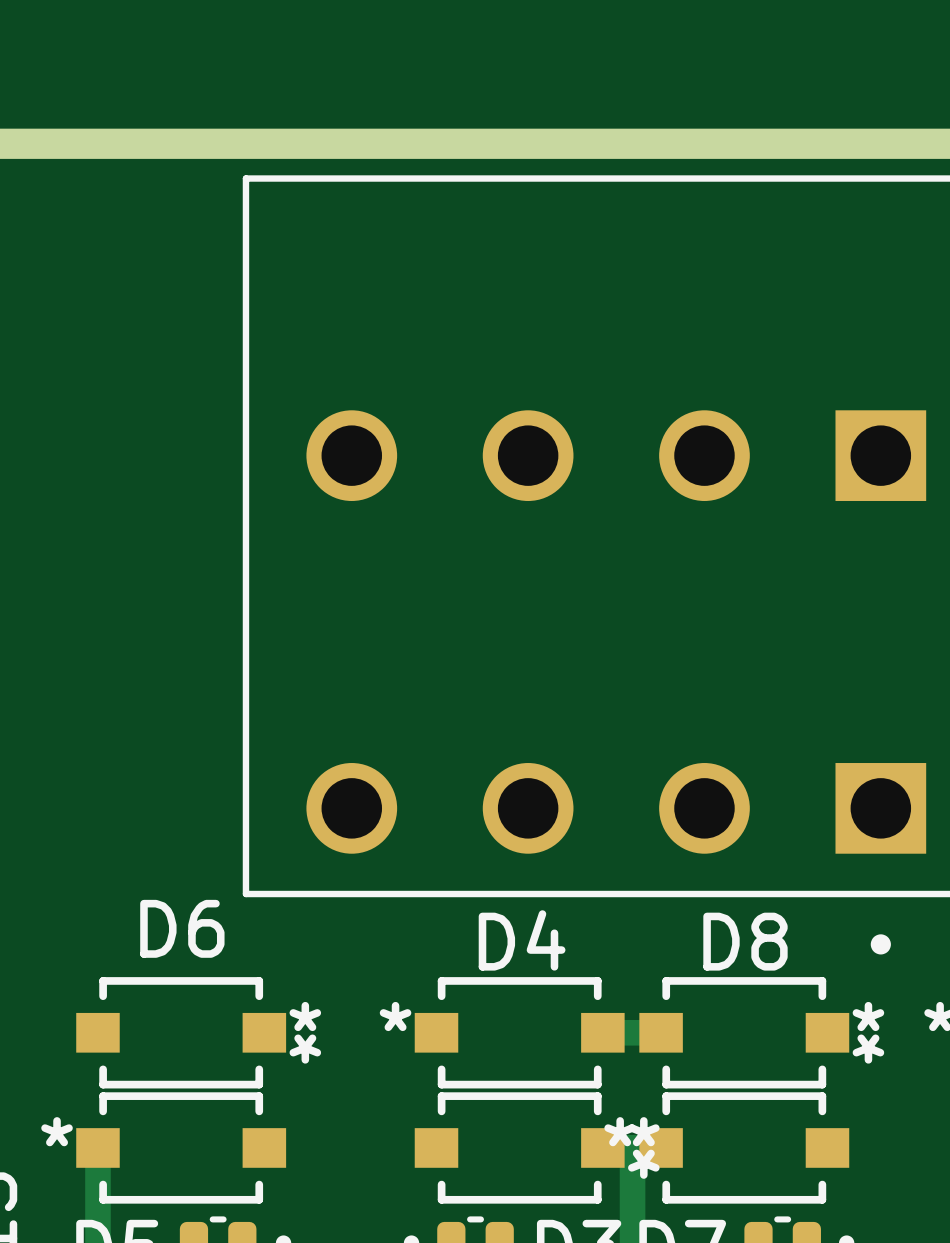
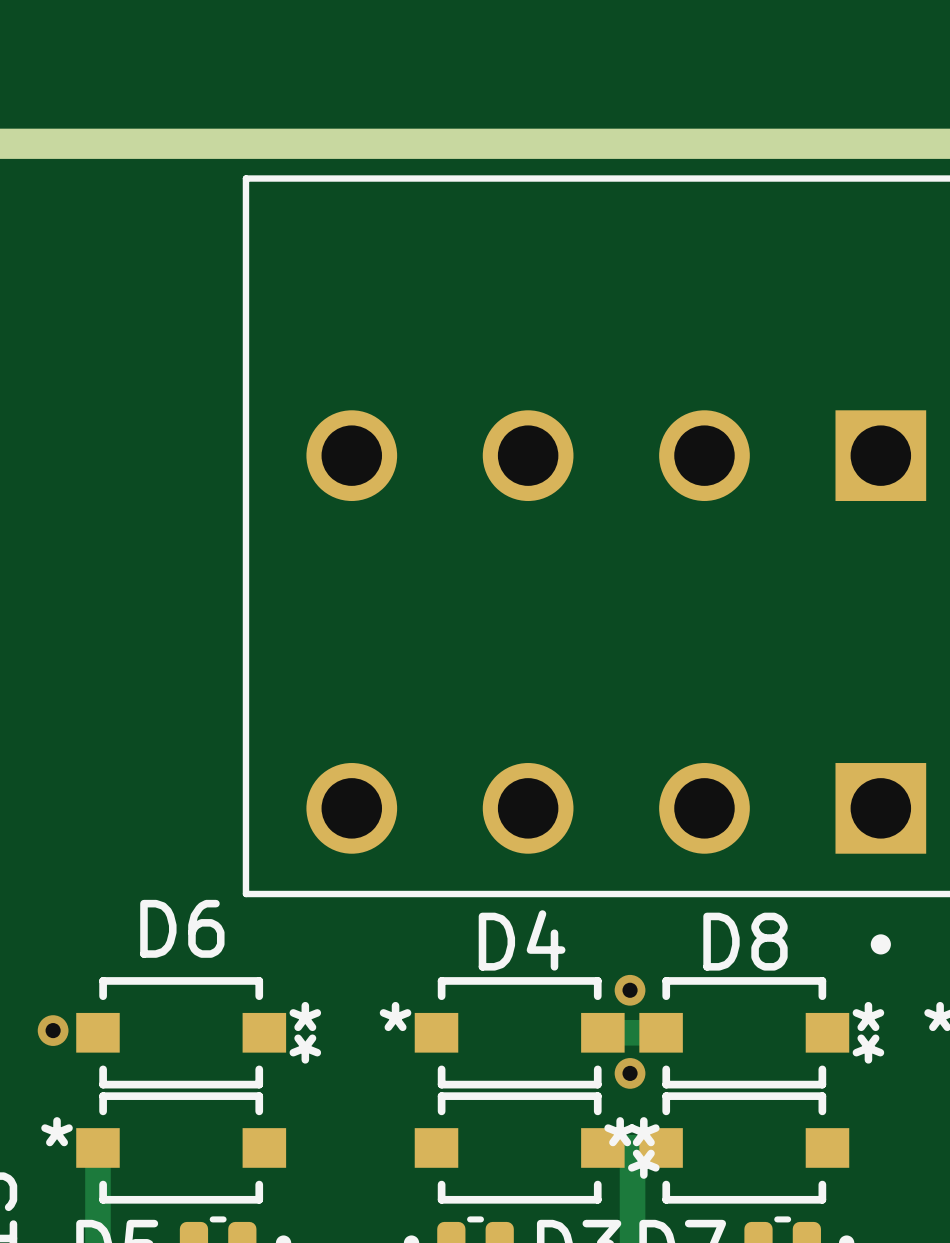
via: none -> (630, 990)
via: none -> (53, 1030)
via: none -> (630, 1073)

